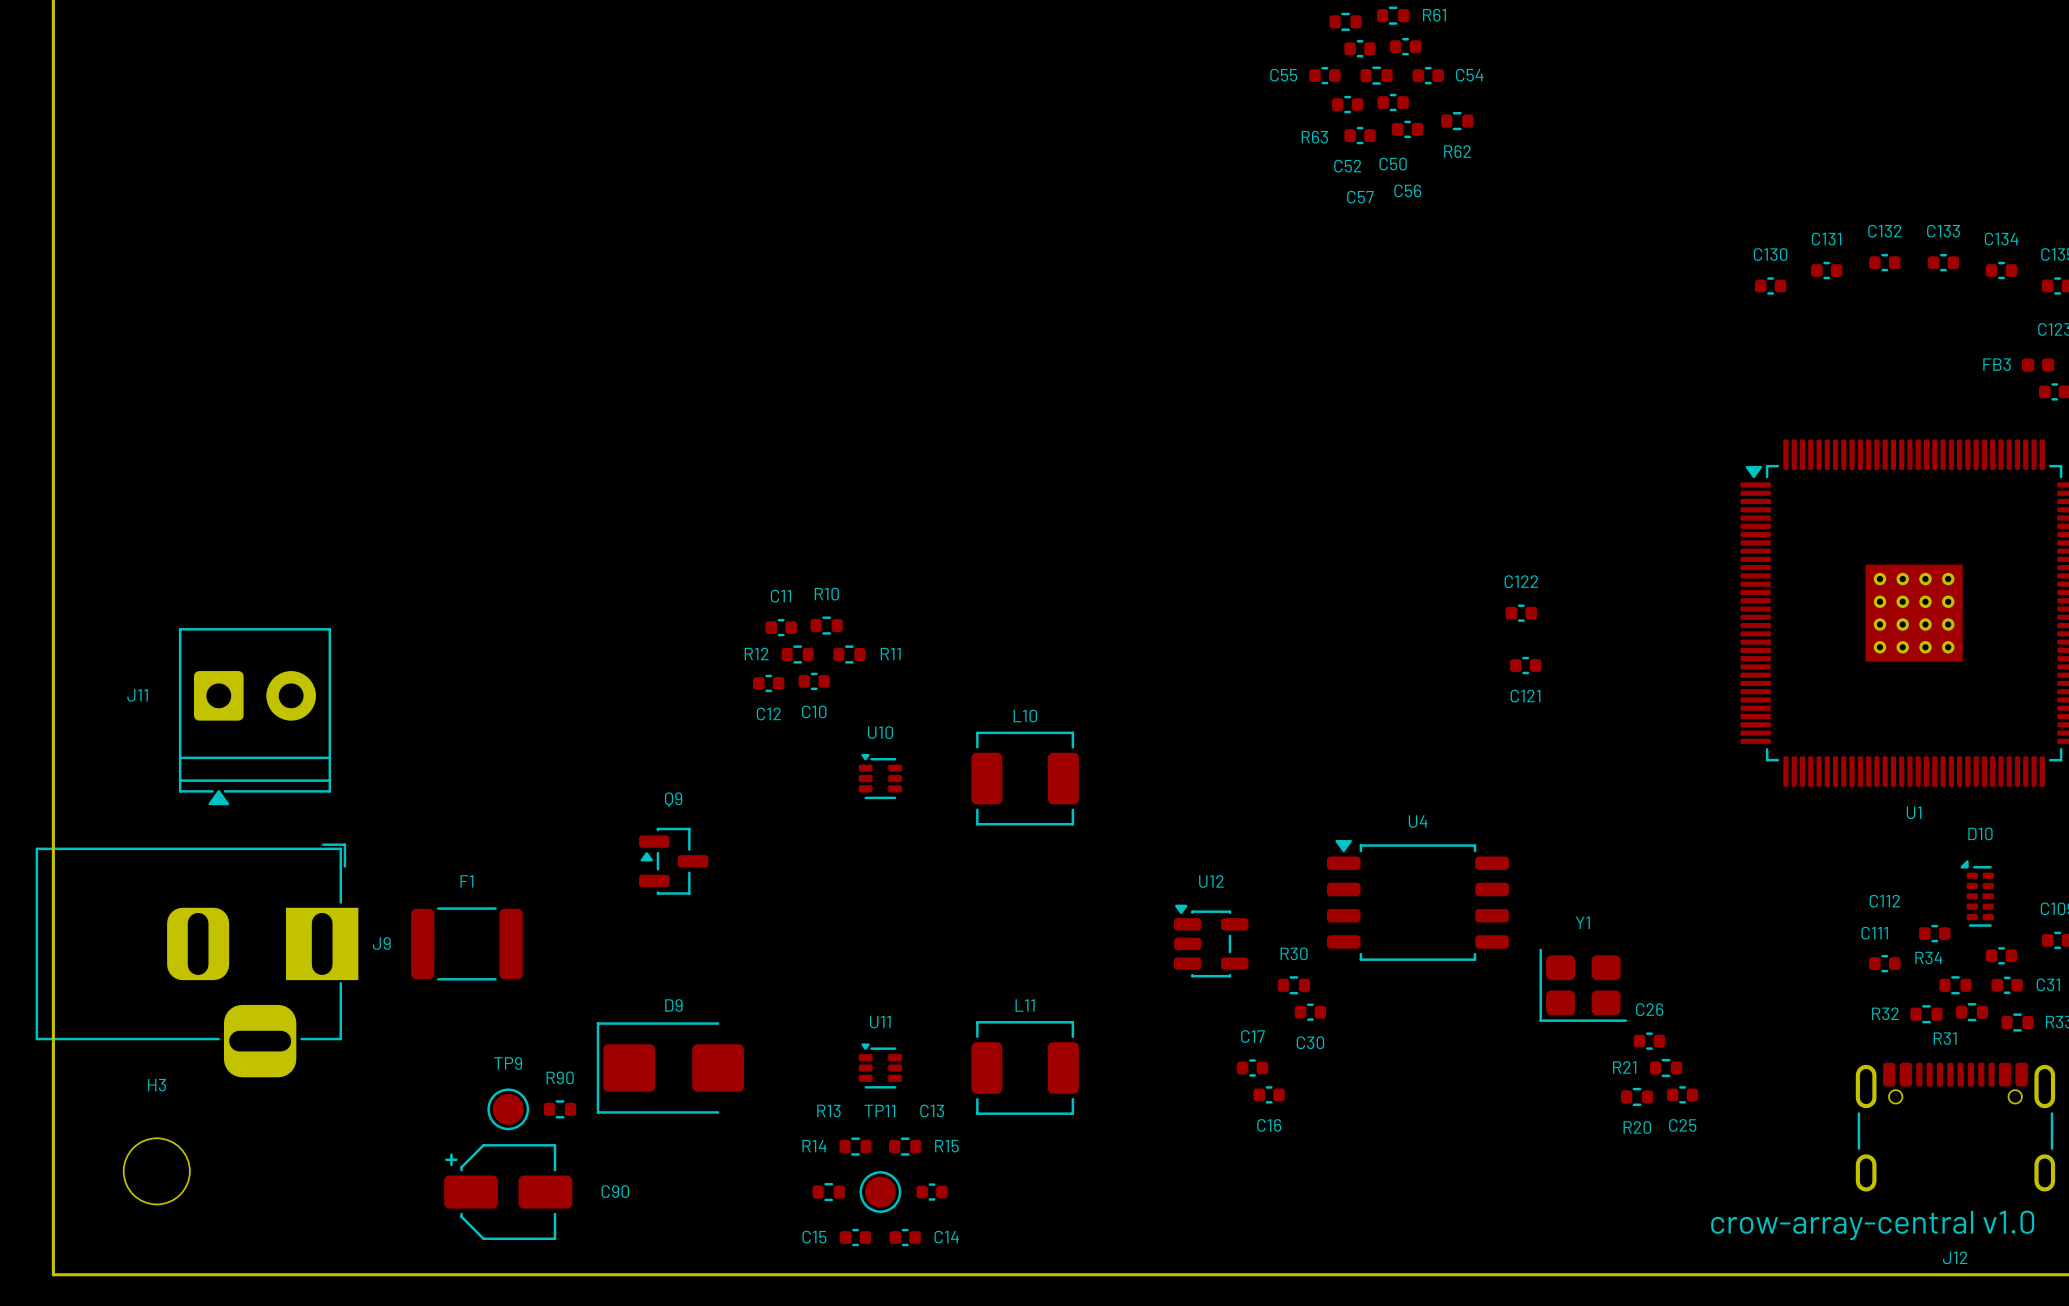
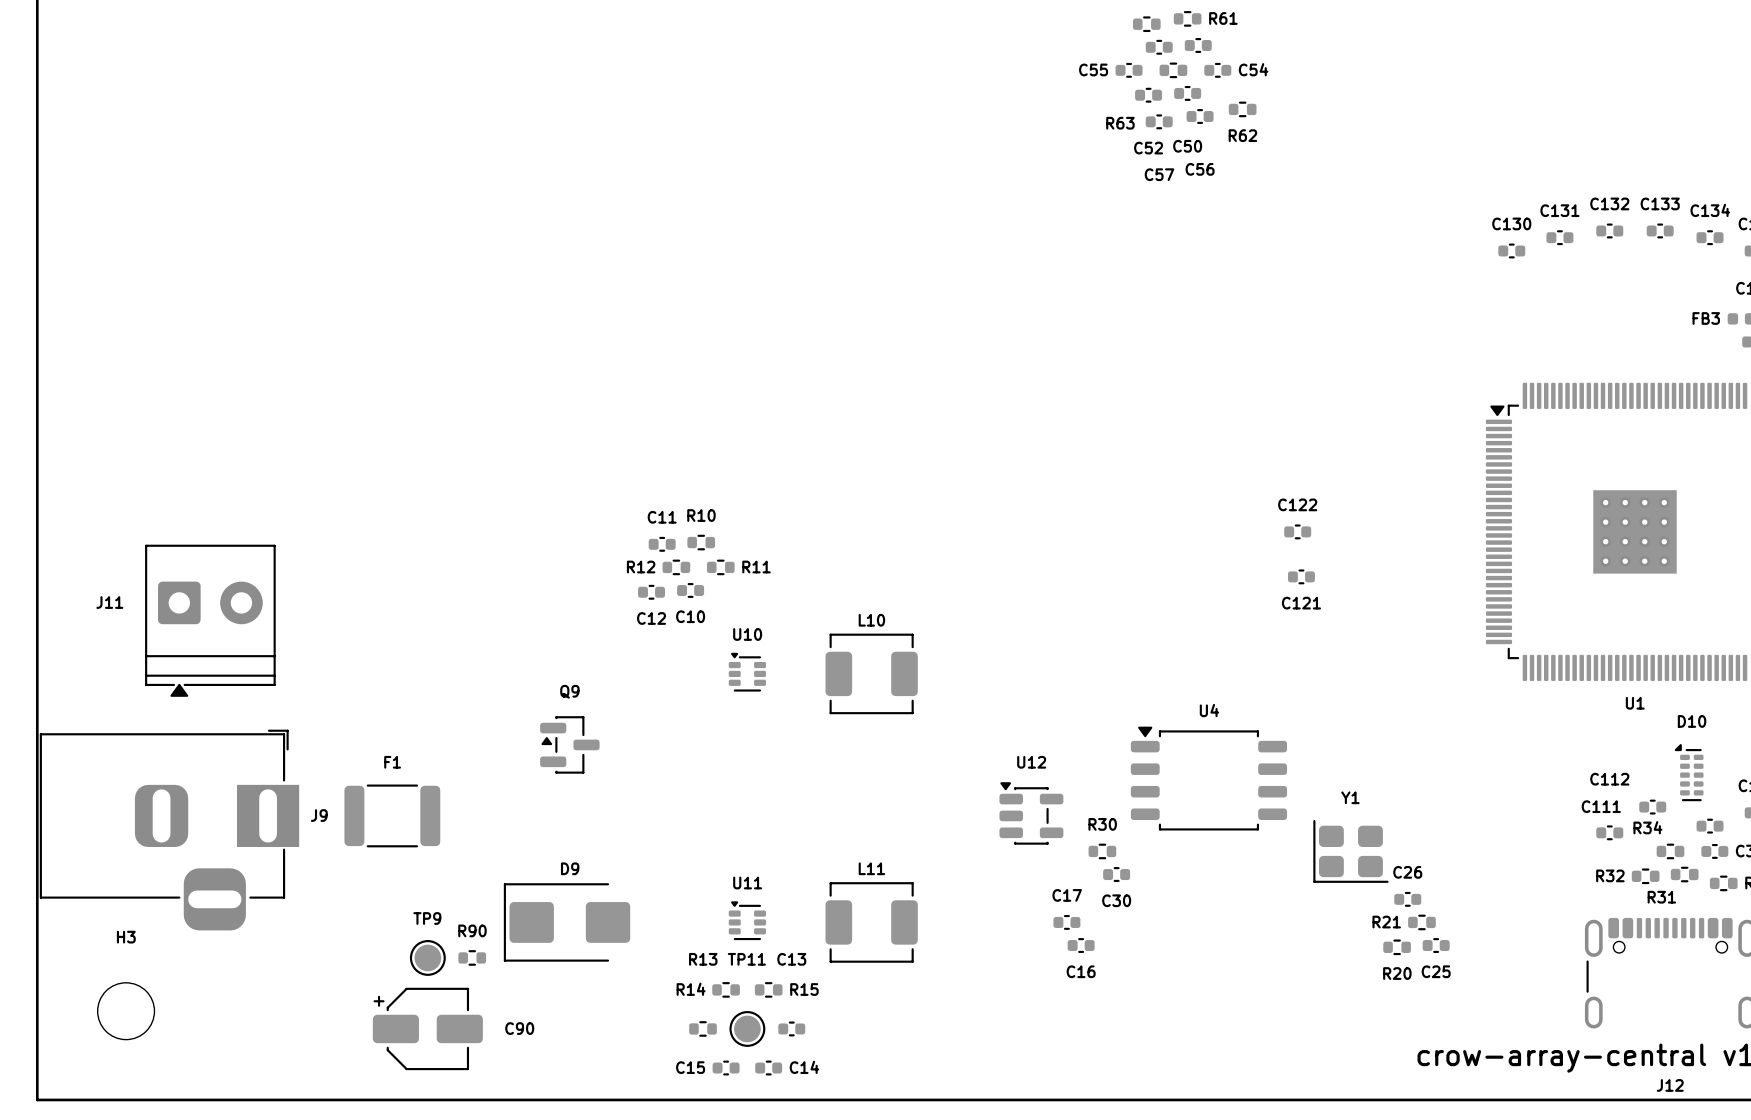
J9 footprint: [35, 843, 359, 1078] -> [39, 729, 300, 931]

